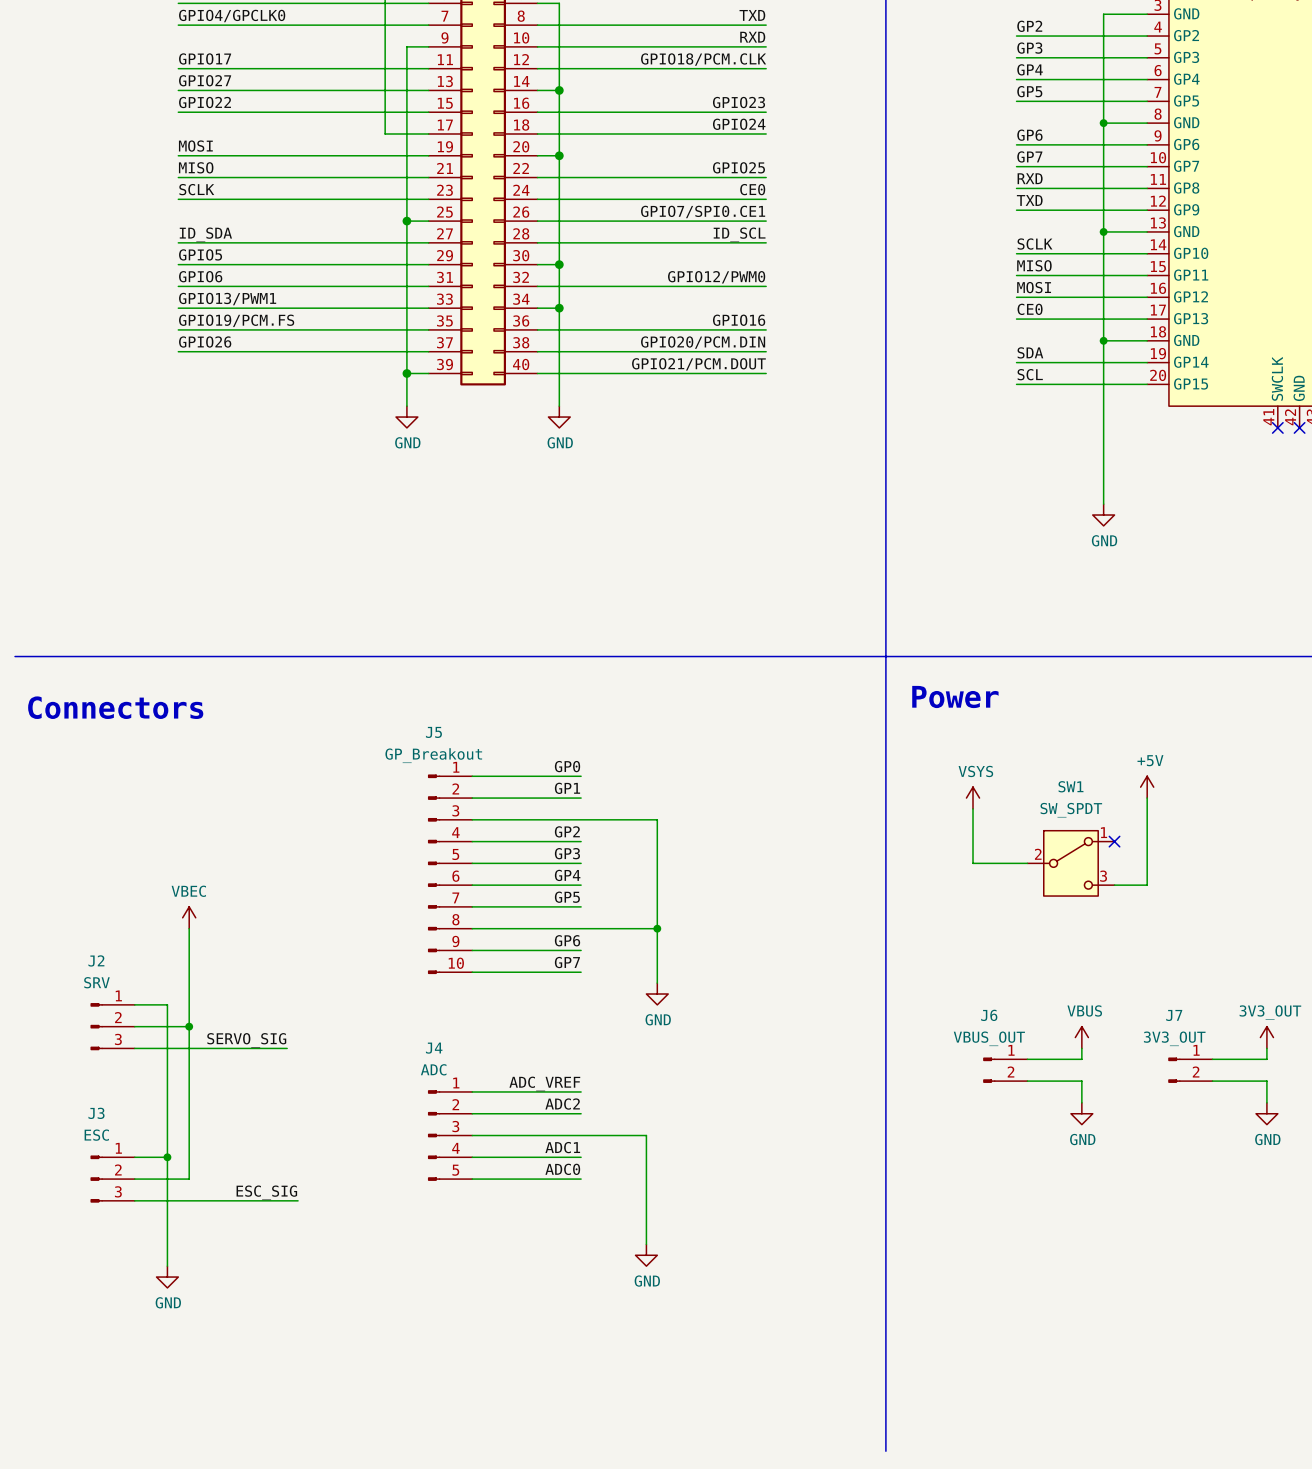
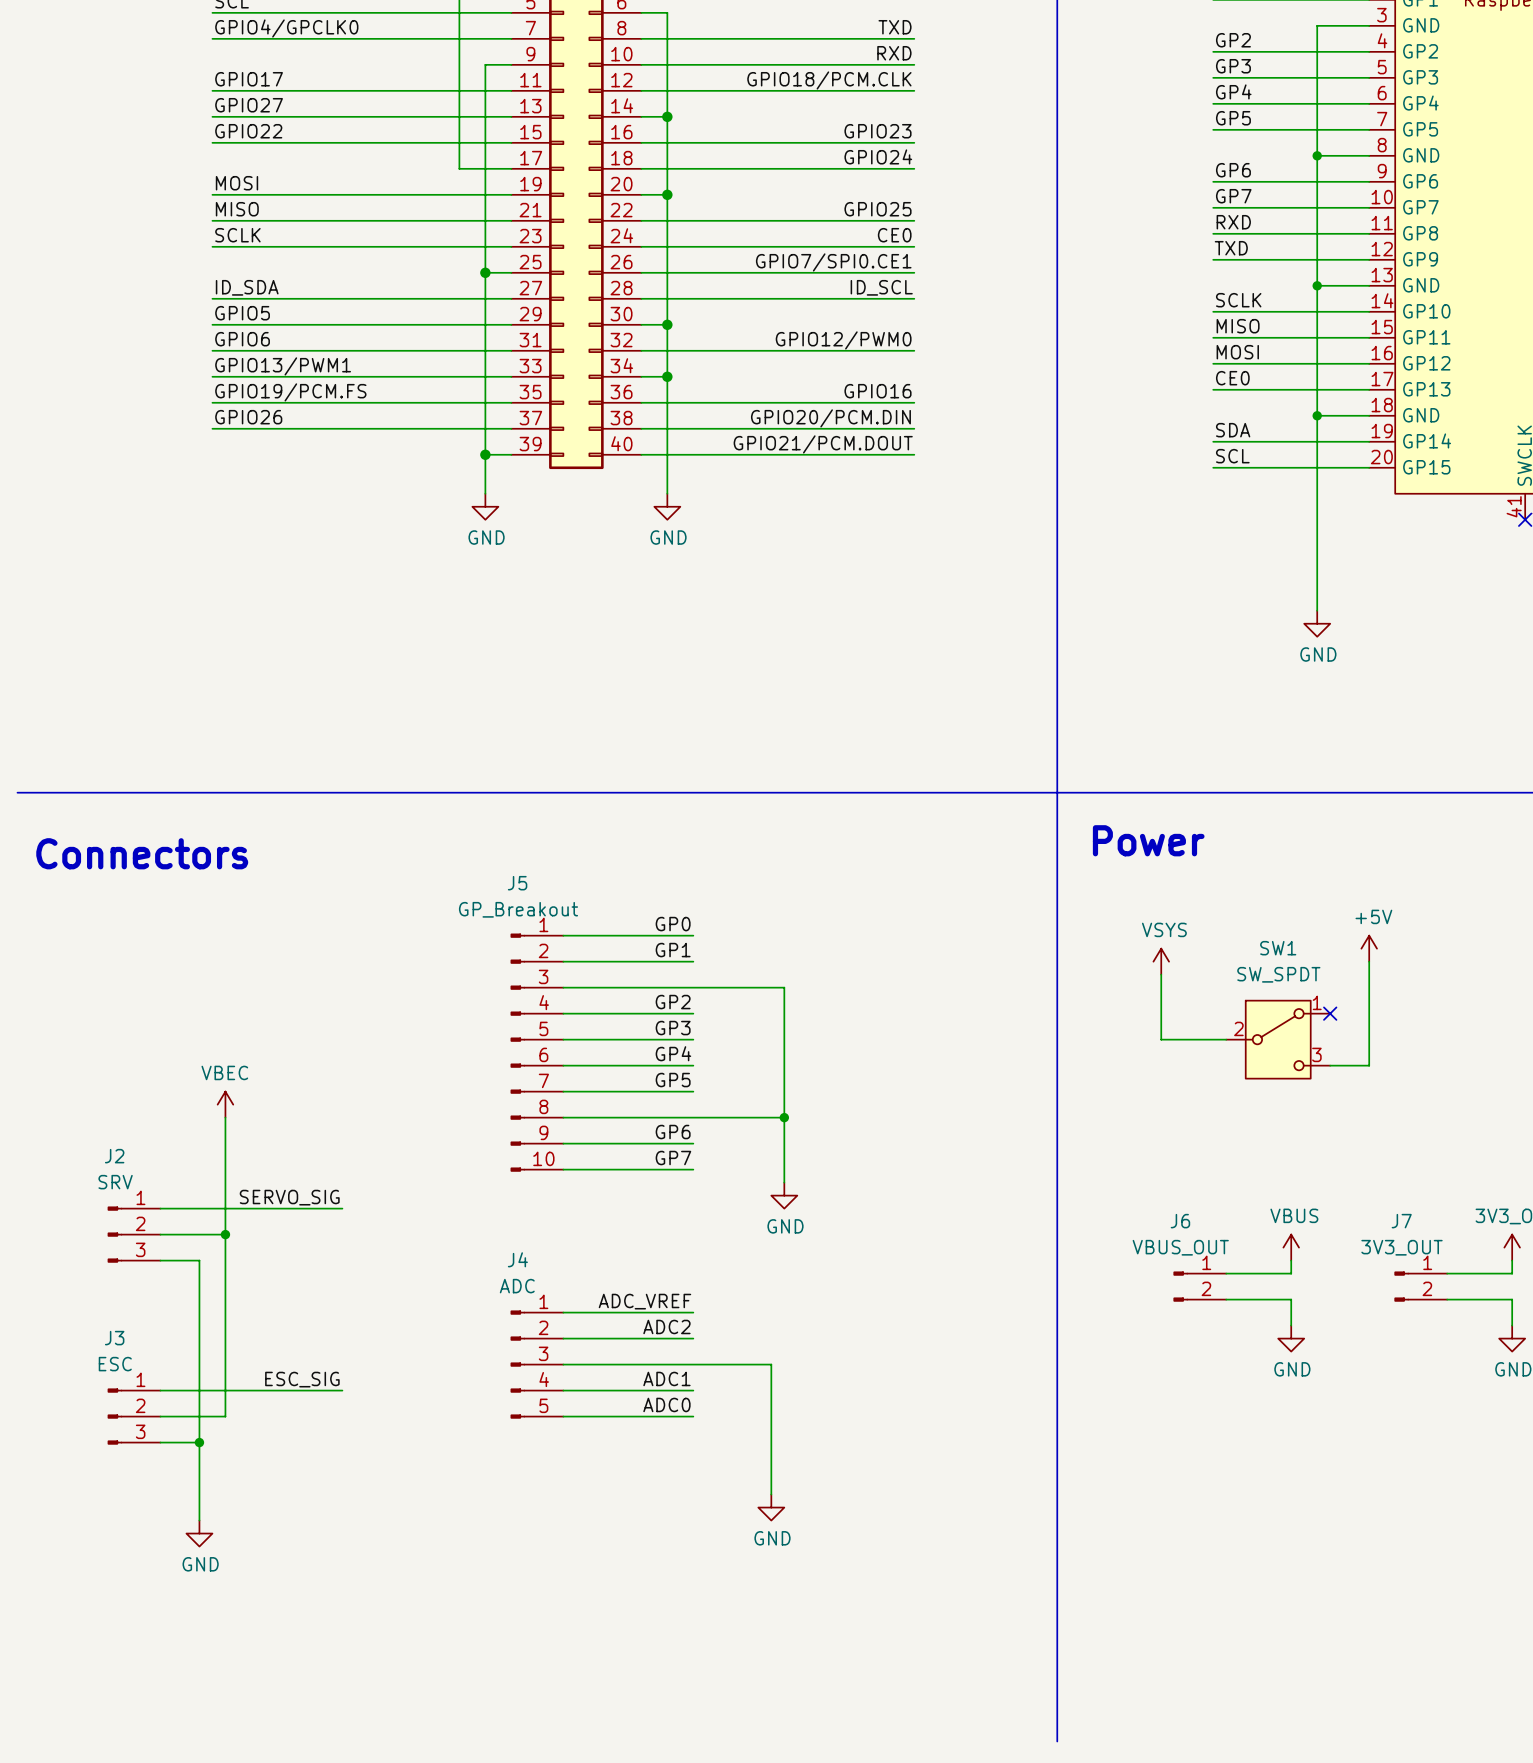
wire: (167, 1004) (167, 1048) (287, 1048) -> (199, 1208) (342, 1208)
label position: SERVO_SIG (246, 1040) -> SERVO_SIG (289, 1197)
wire: none -> (199, 1390) (342, 1390)
junction position: (167, 1157) -> (199, 1442)
label position: ESC_SIG (266, 1192) -> ESC_SIG (302, 1379)
wire: (167, 1200) (298, 1200) -> none

